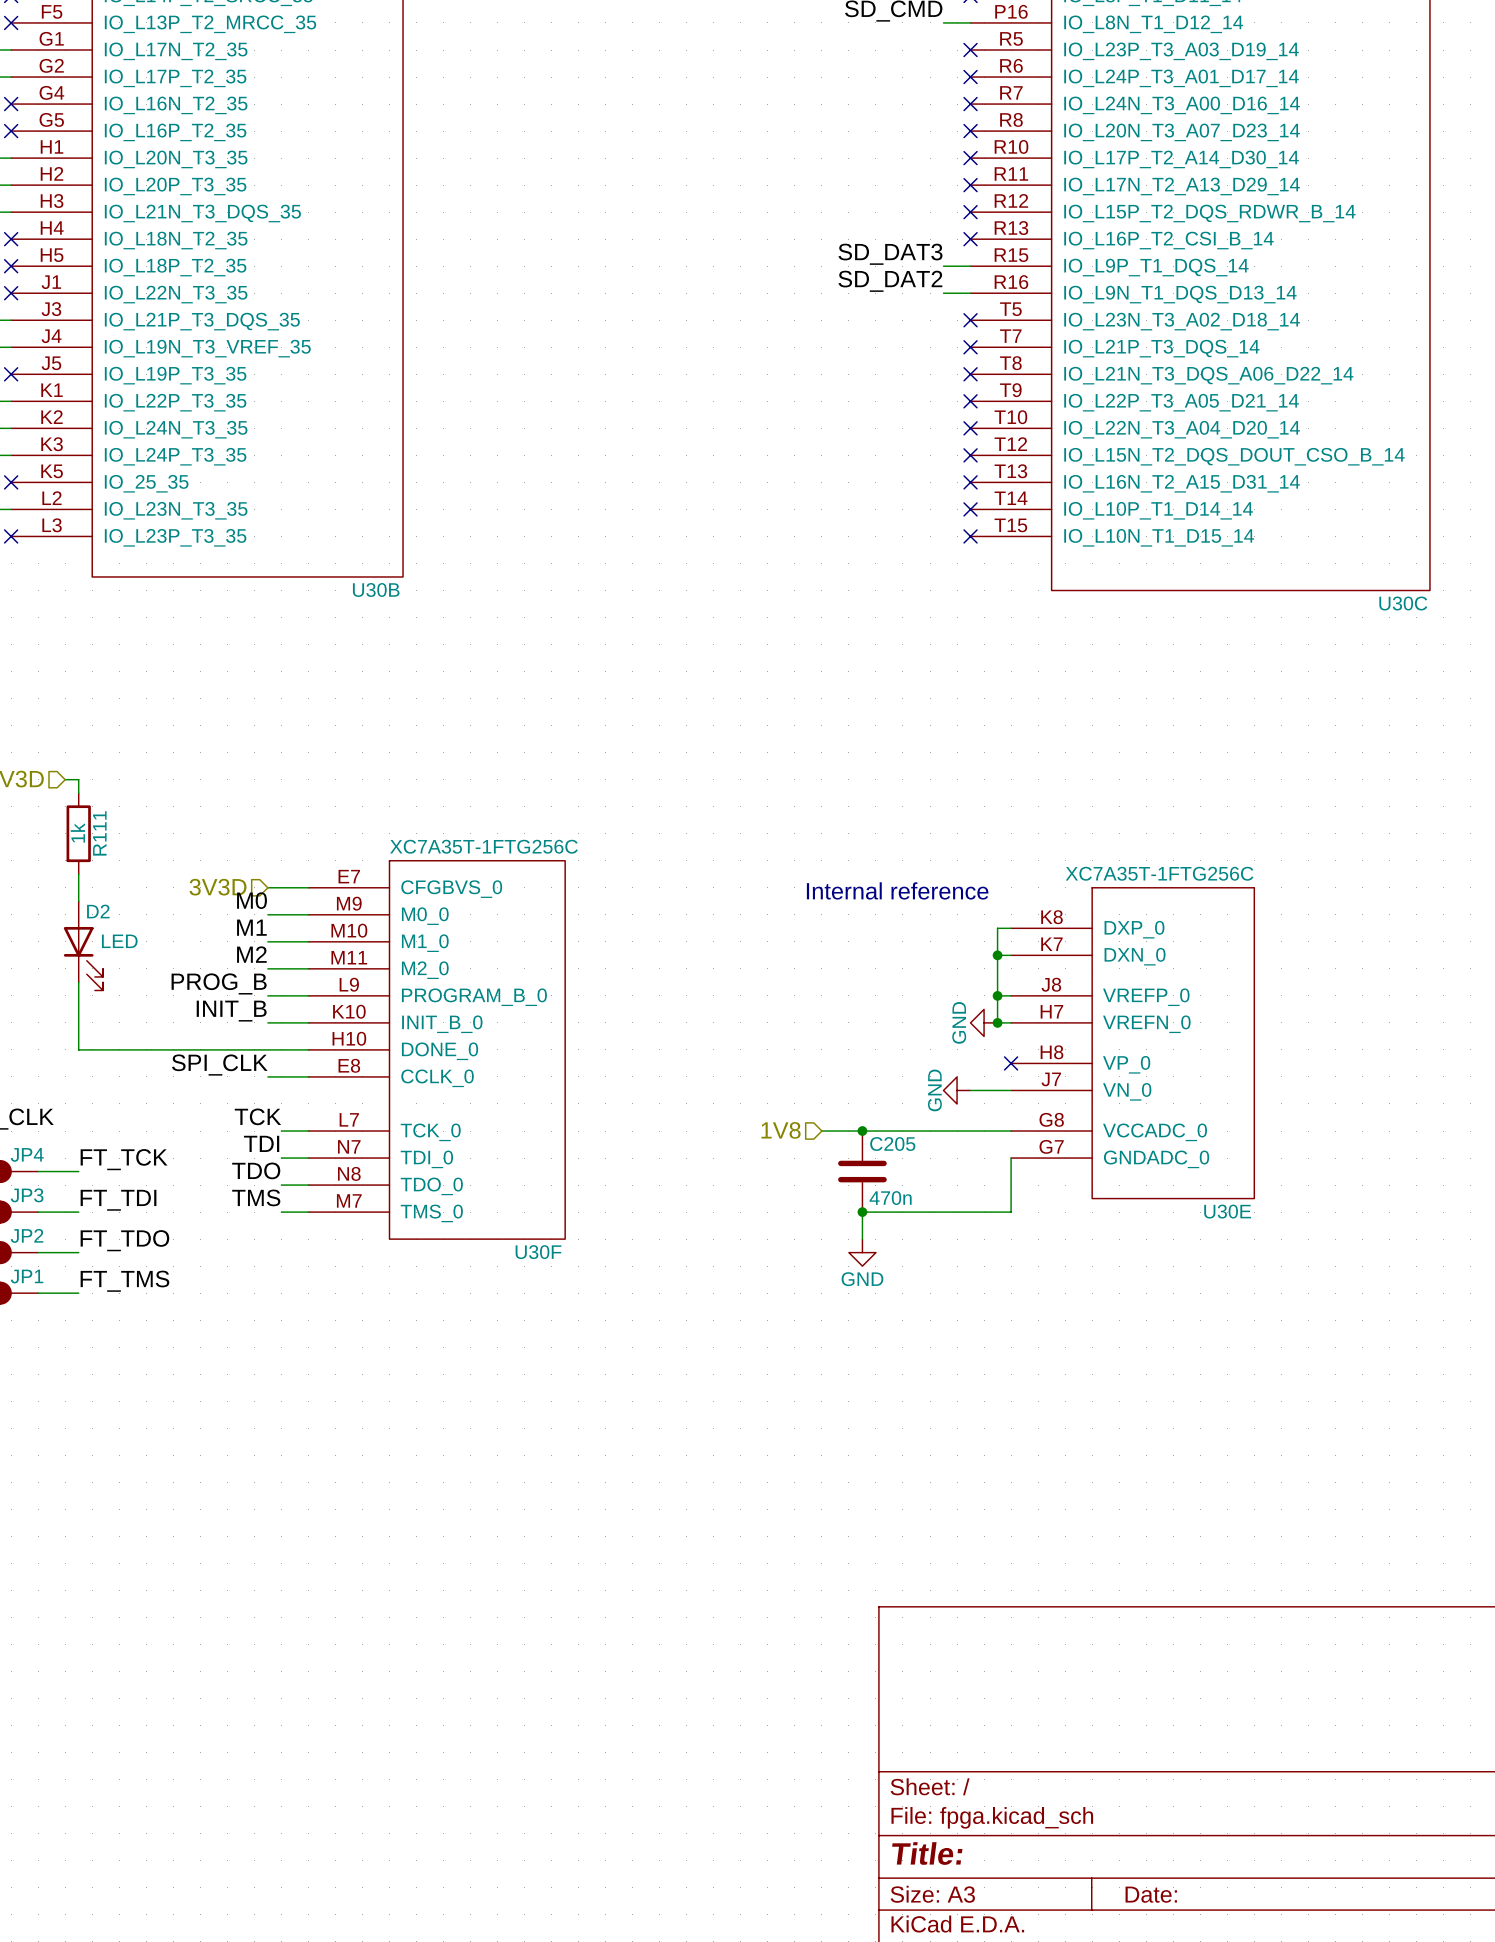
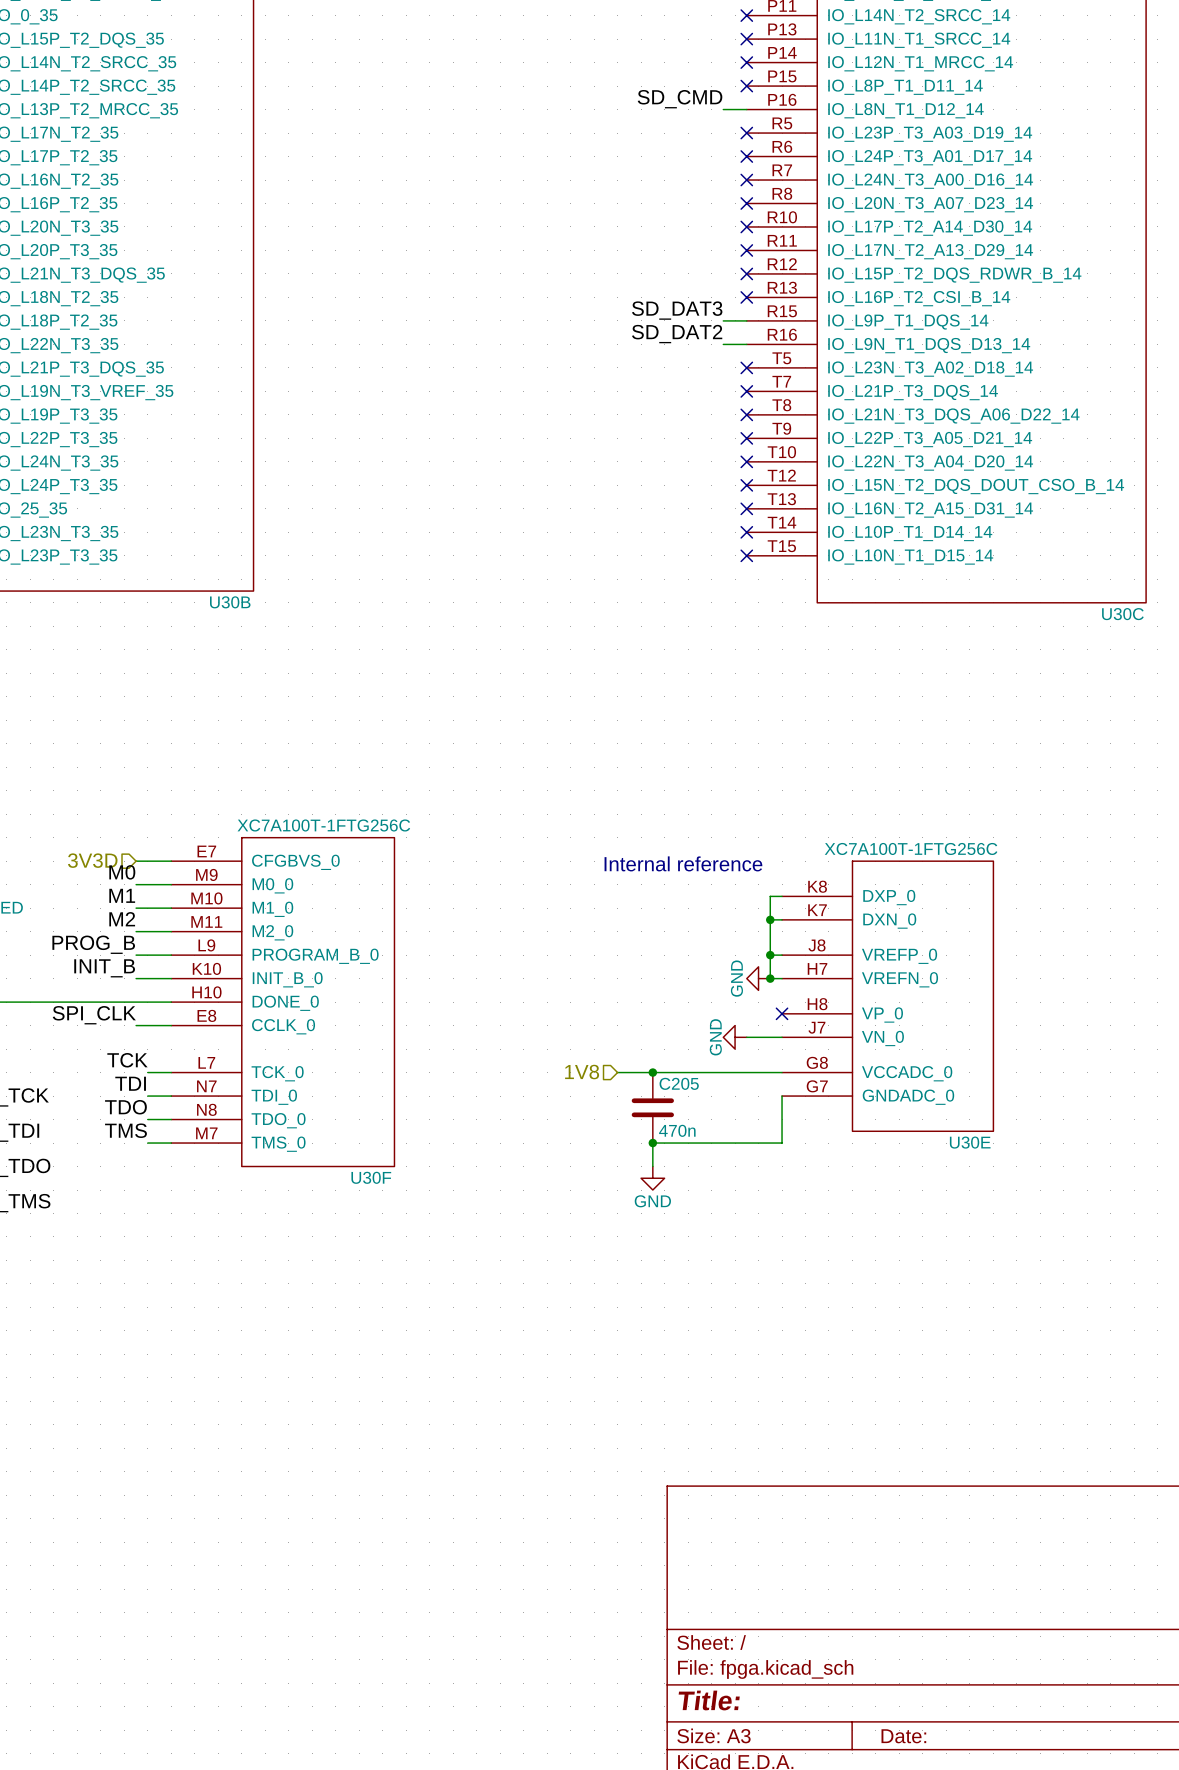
U30F value: XC7A35T-1FTG256C (483, 846) -> XC7A100T-1FTG256C (323, 825)
U30E value: XC7A35T-1FTG256C (1159, 873) -> XC7A100T-1FTG256C (911, 848)

